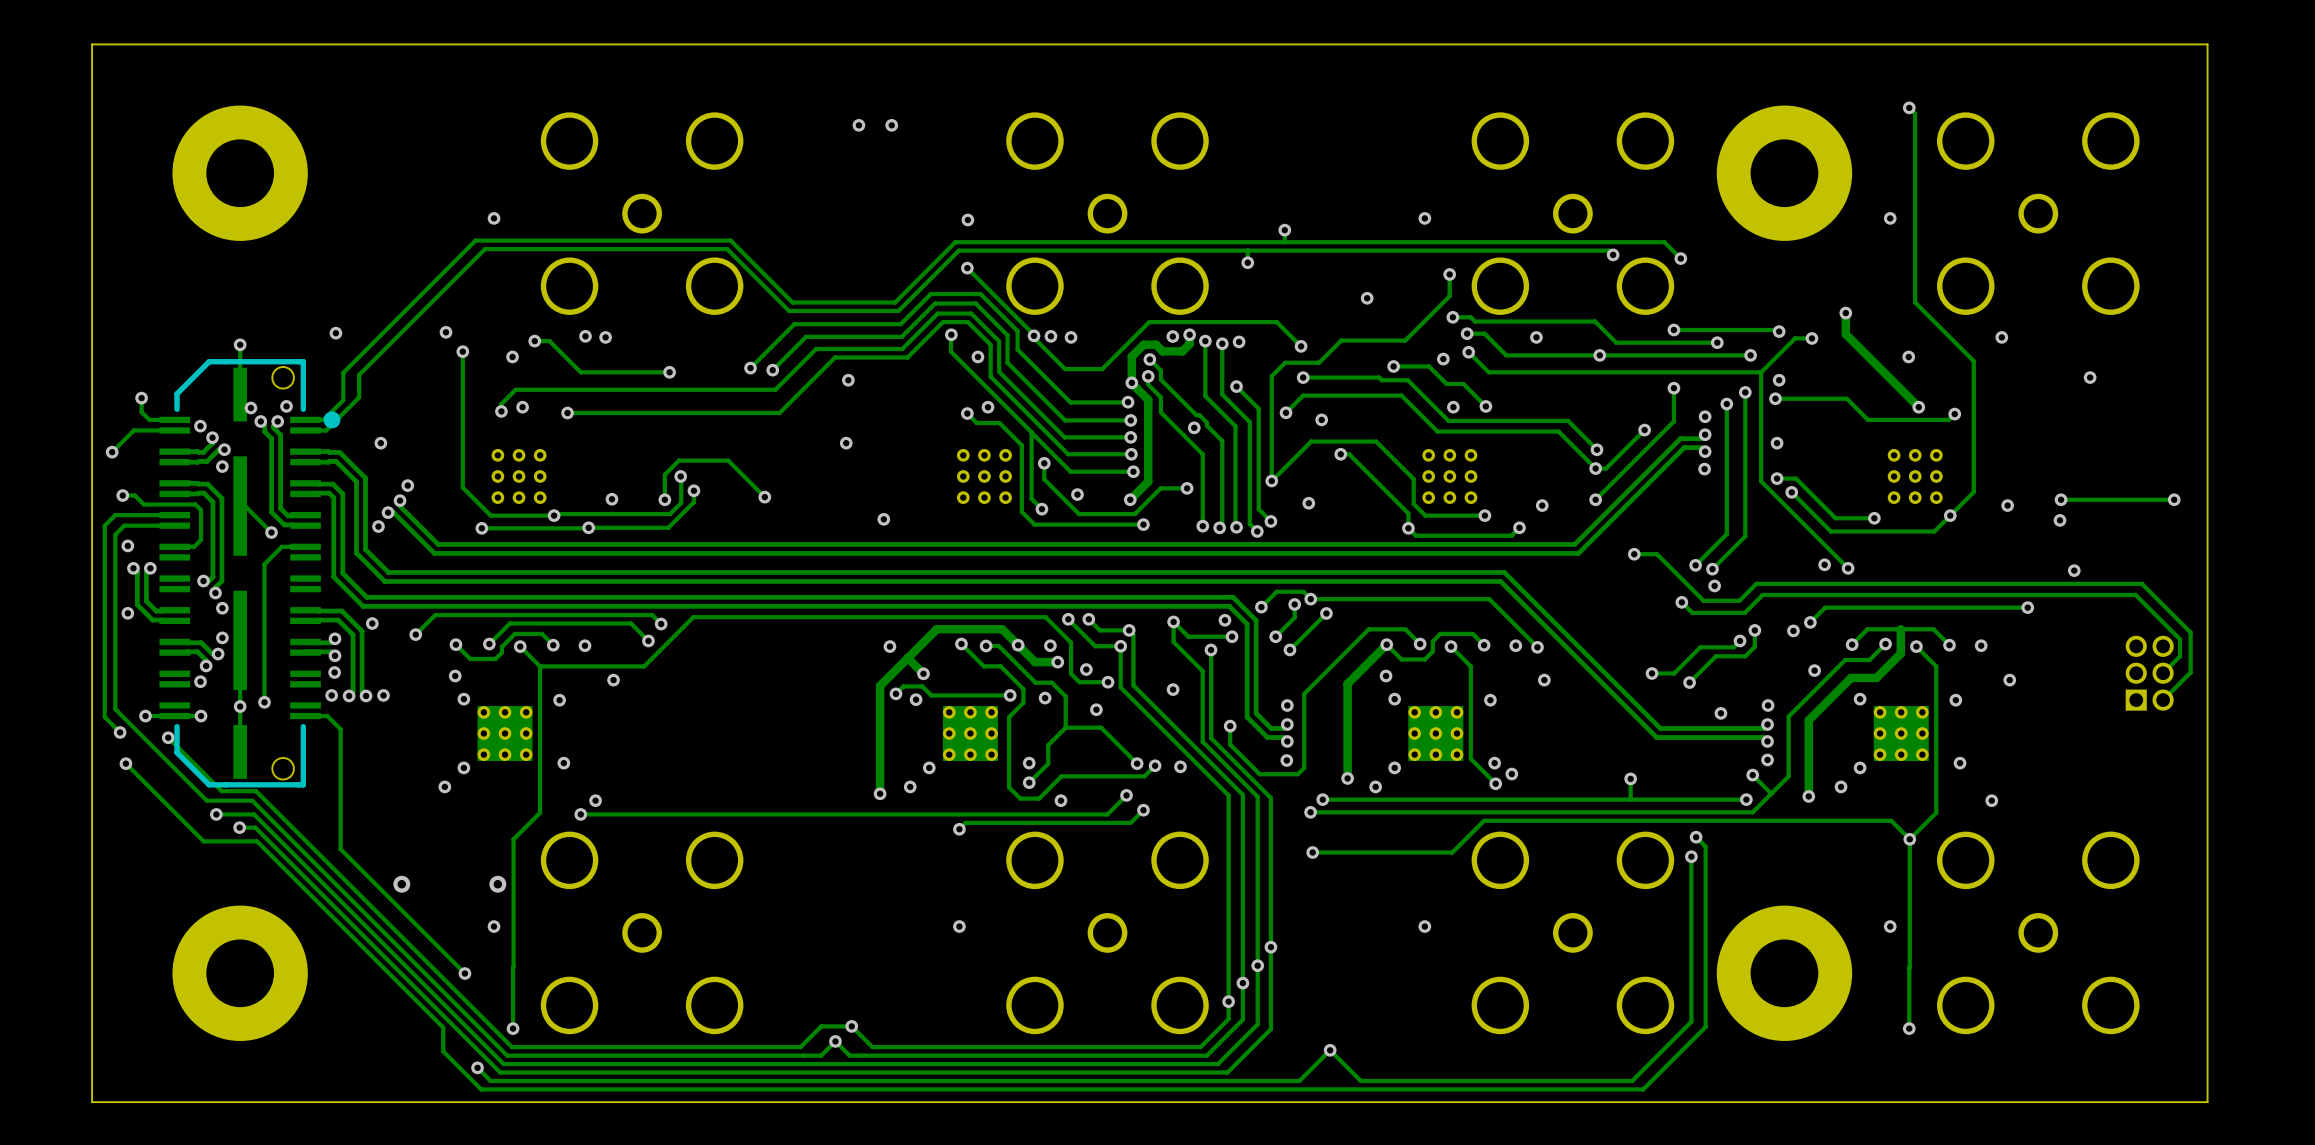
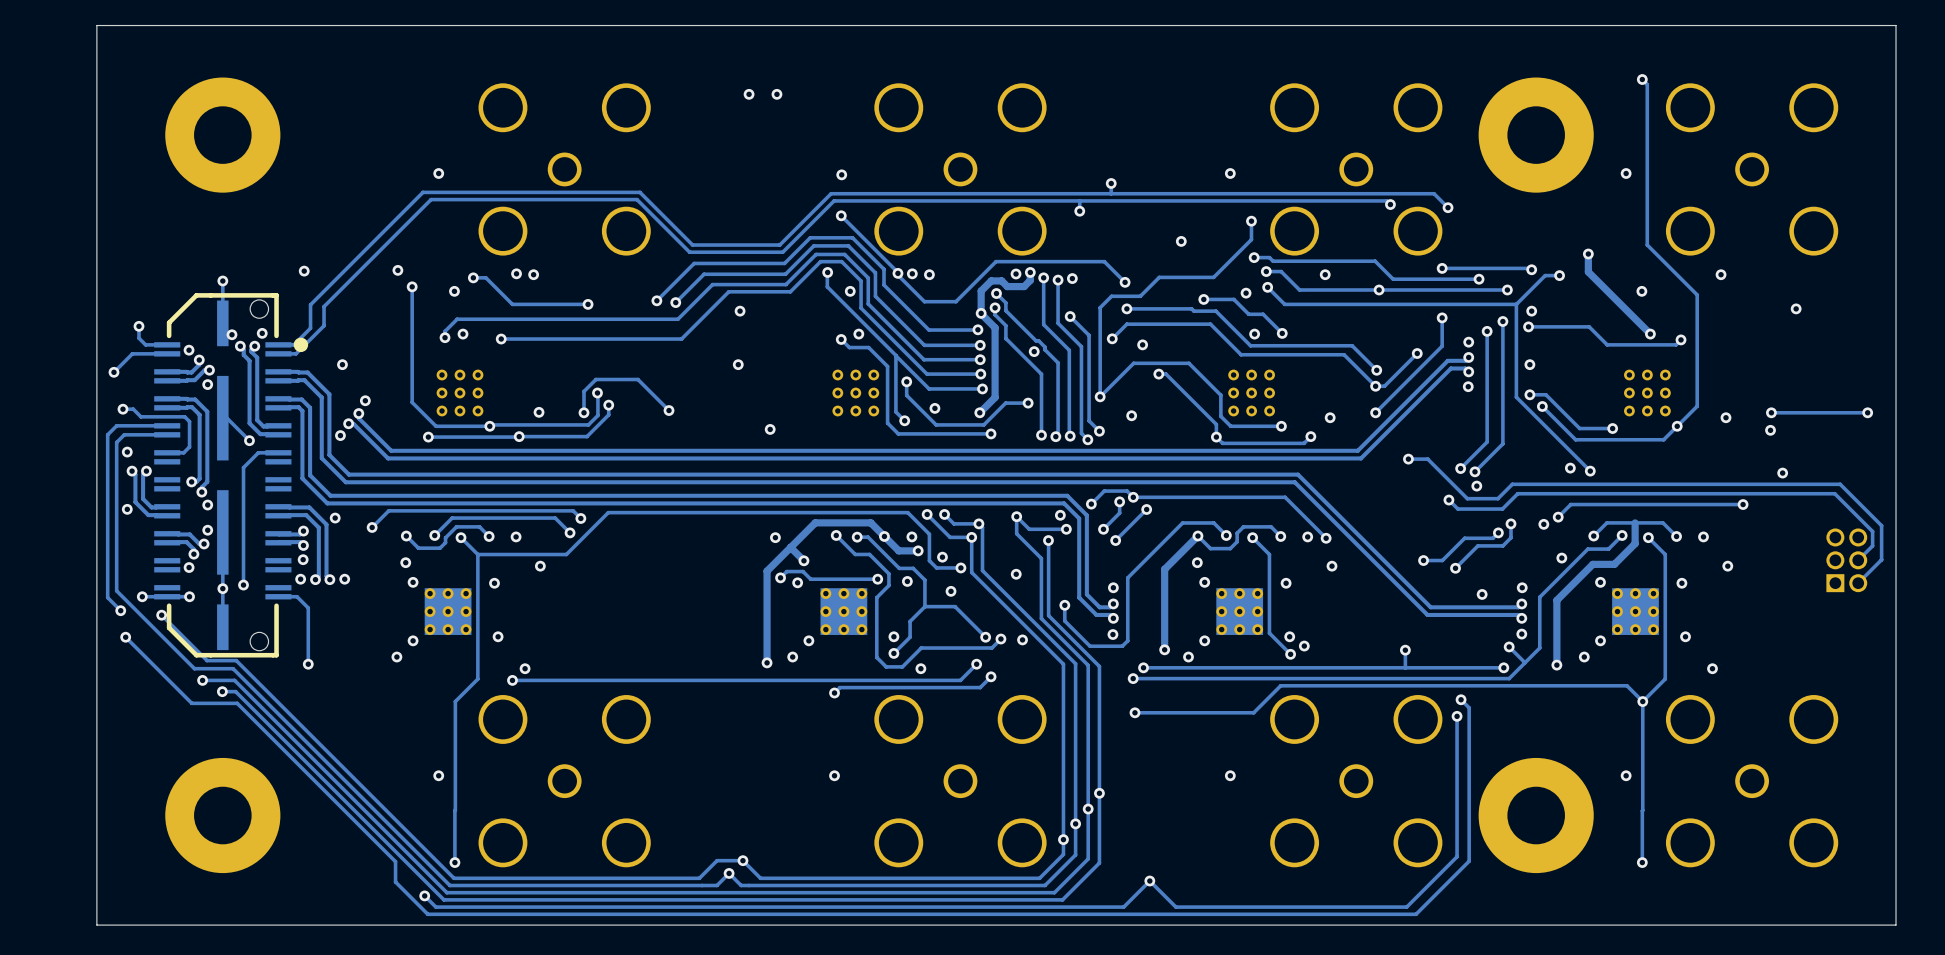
track: (340, 795) (340, 849) (464, 973) -> none
via: none -> (308, 664)
via: (401, 884) -> none
via: (497, 884) -> none
via: (464, 973) -> none

